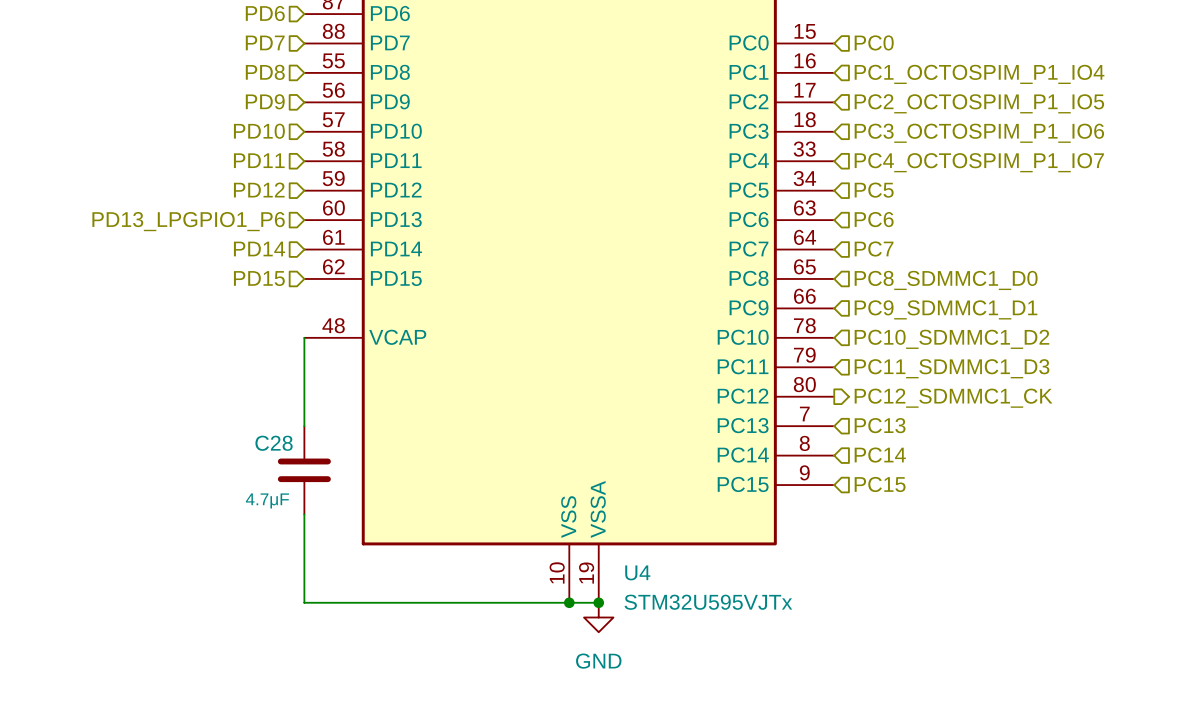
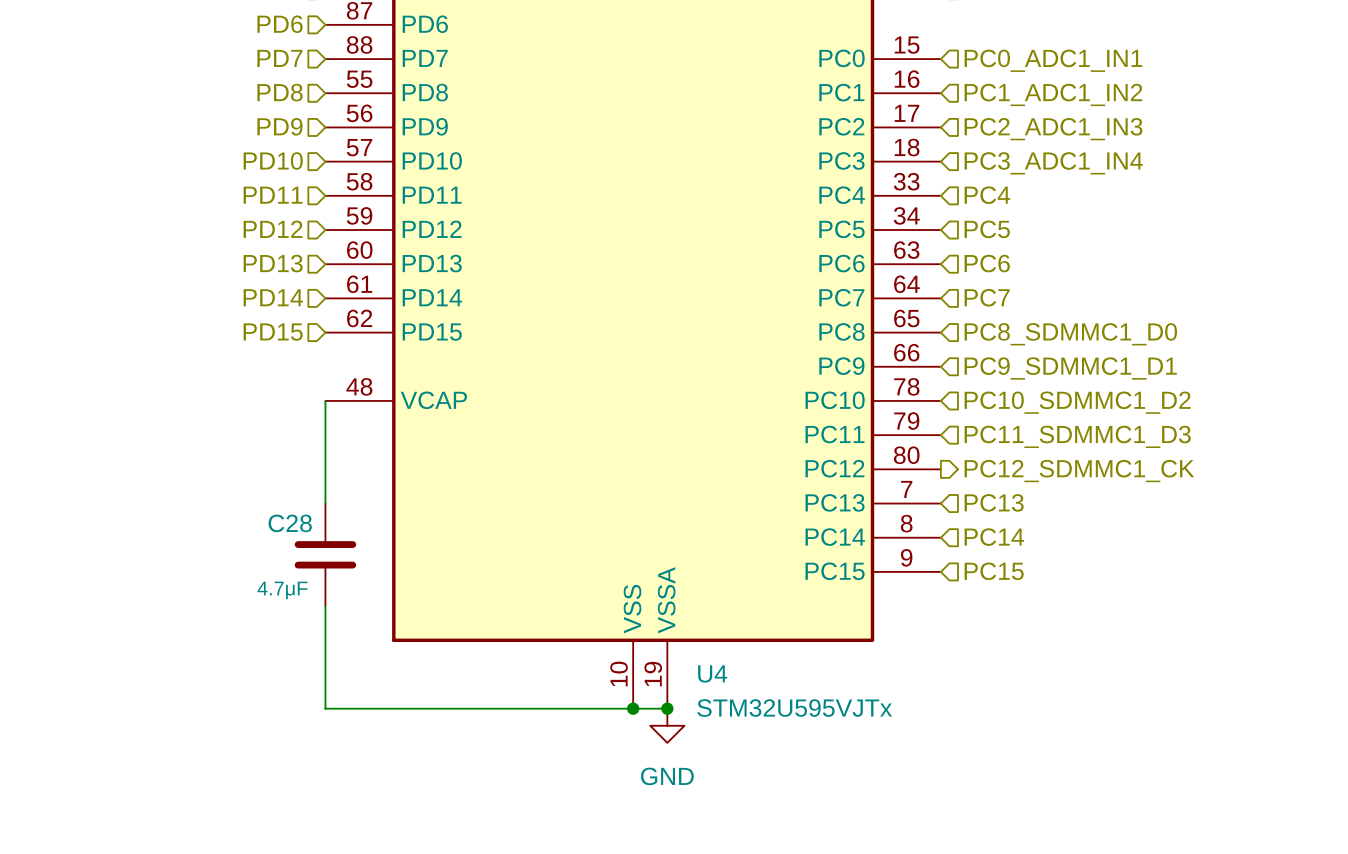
hierarchical label: PC0 (874, 42) -> PC0_ADC1_IN1 (1053, 60)
hierarchical label: PC1_OCTOSPIM_P1_IO4 (979, 74) -> PC1_ADC1_IN2 (1053, 94)
hierarchical label: PC2_OCTOSPIM_P1_IO5 (979, 103) -> PC2_ADC1_IN3 (1053, 129)
hierarchical label: PC3_OCTOSPIM_P1_IO6 (979, 133) -> PC3_ADC1_IN4 (1053, 163)
hierarchical label: PC4_OCTOSPIM_P1_IO7 (979, 162) -> PC4 (987, 195)
hierarchical label: PD13_LPGPIO1_P6 (188, 221) -> PD13 (273, 263)

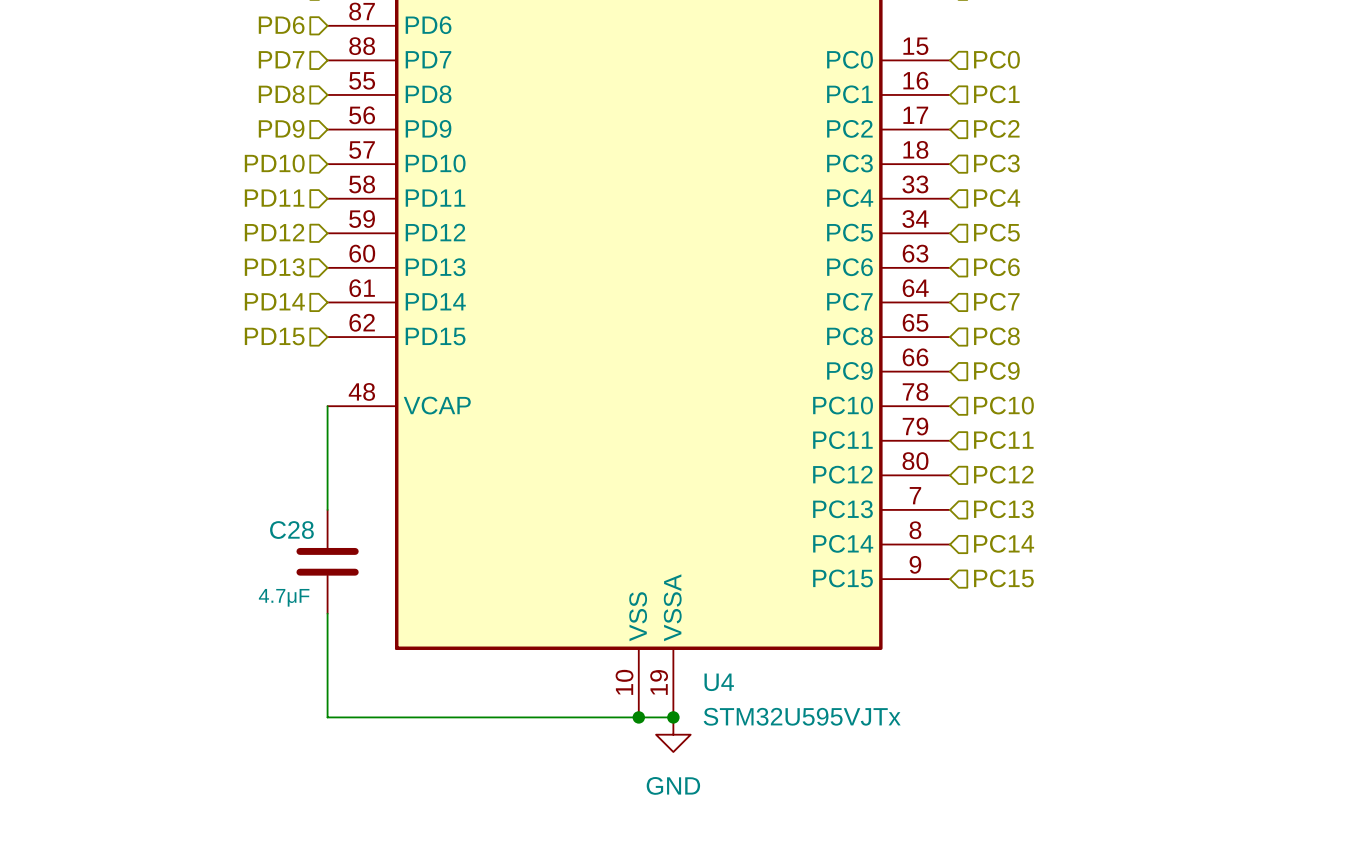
hierarchical label: PC0_ADC1_IN1 (1053, 60) -> PC0 (996, 59)
hierarchical label: PC1_ADC1_IN2 (1053, 94) -> PC1 (996, 94)
hierarchical label: PC2_ADC1_IN3 (1053, 129) -> PC2 (996, 128)
hierarchical label: PC3_ADC1_IN4 (1053, 163) -> PC3 (996, 163)
hierarchical label: PC8_SDMMC1_D0 (1070, 334) -> PC8 (996, 336)
hierarchical label: PC9_SDMMC1_D1 (1070, 368) -> PC9 (996, 370)
hierarchical label: PC10_SDMMC1_D2 (1077, 402) -> PC10 (1003, 405)
hierarchical label: PC11_SDMMC1_D3 (1077, 436) -> PC11 (1003, 440)
hierarchical label shape: output (1079, 471) -> input (1003, 474)
hierarchical label: PC12_SDMMC1_CK (1079, 471) -> PC12 (1003, 474)

